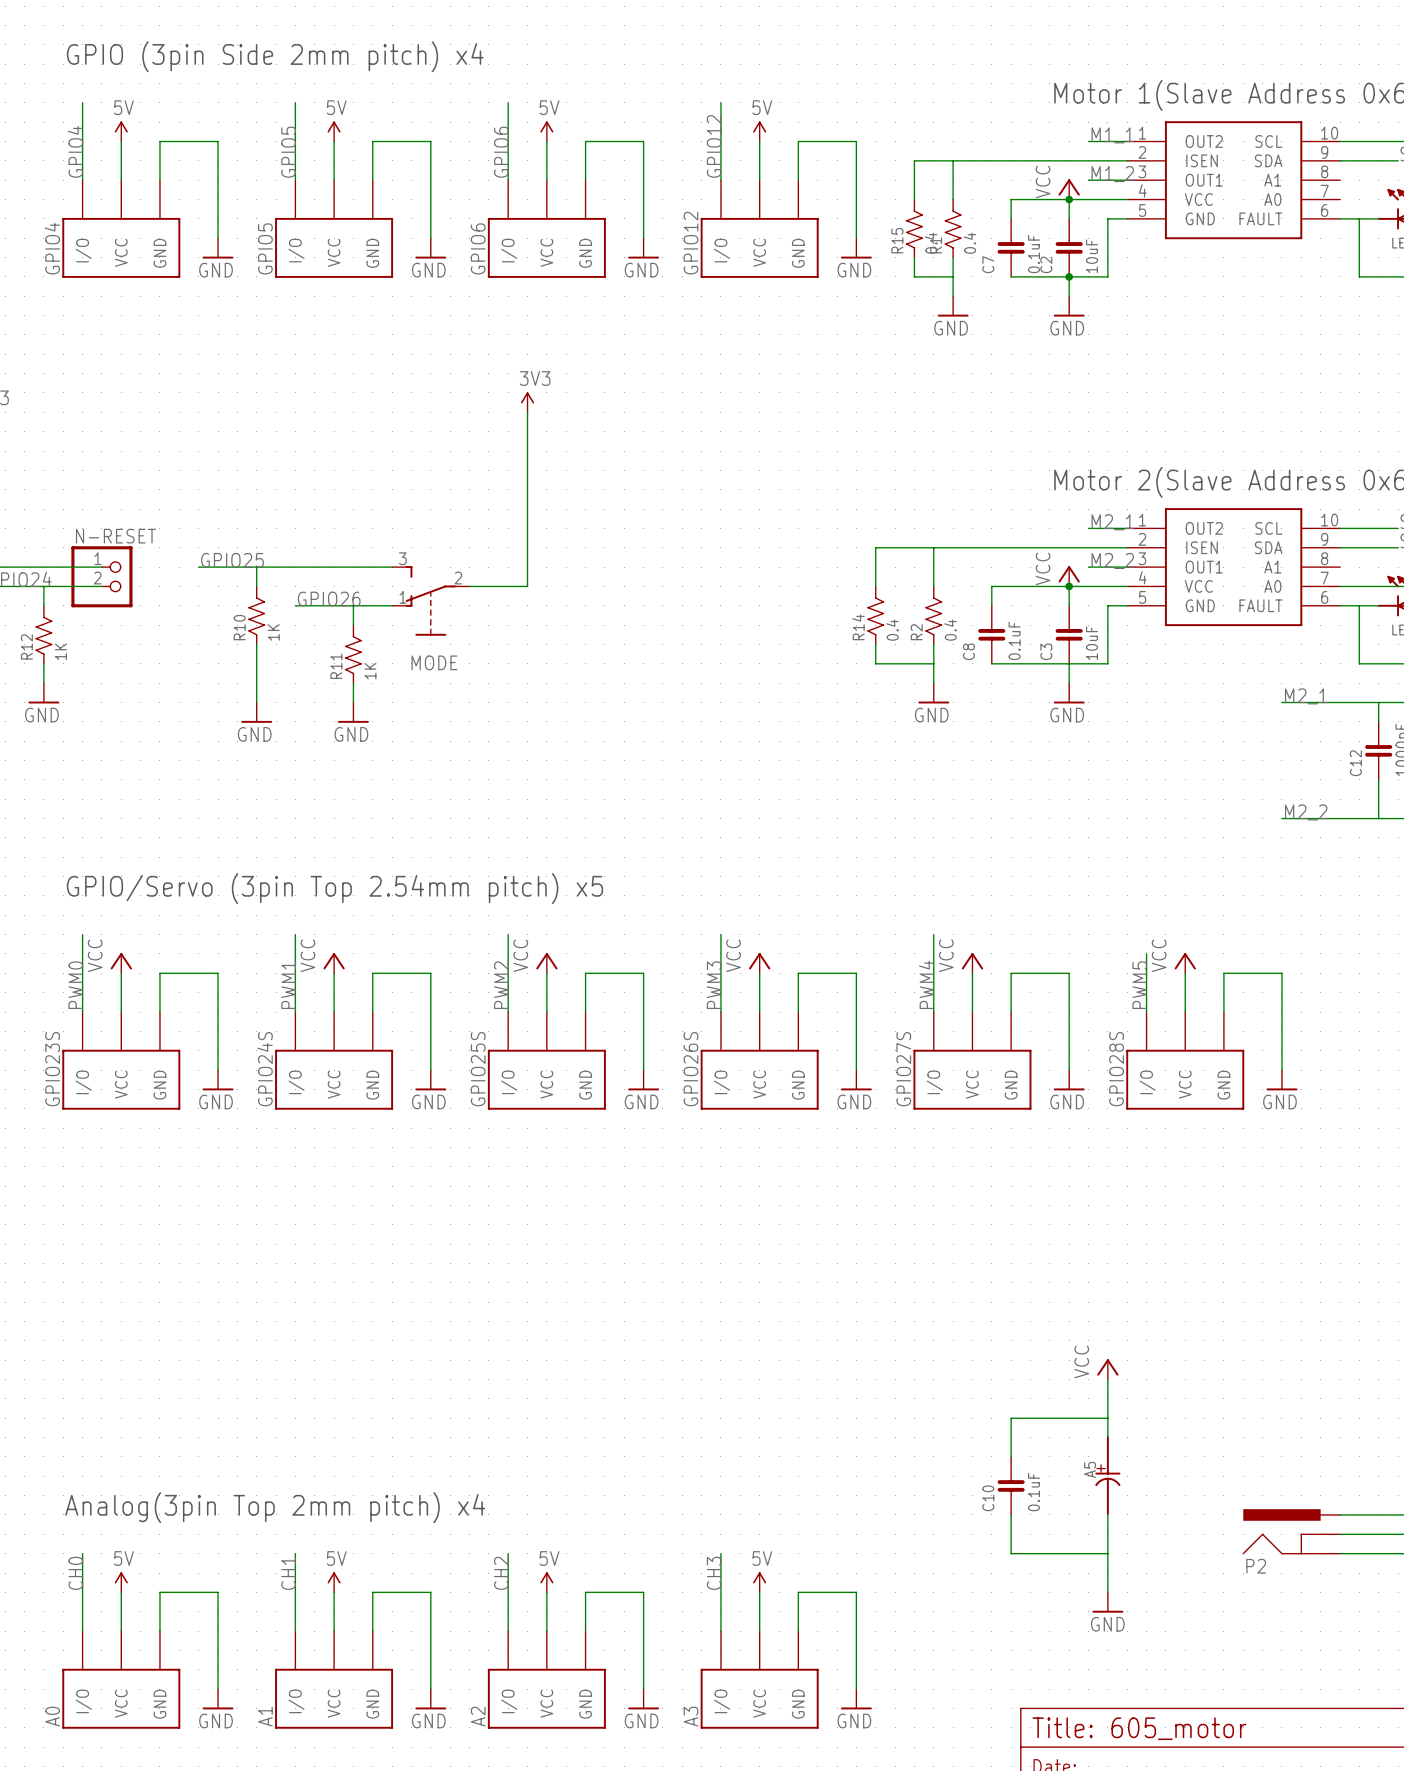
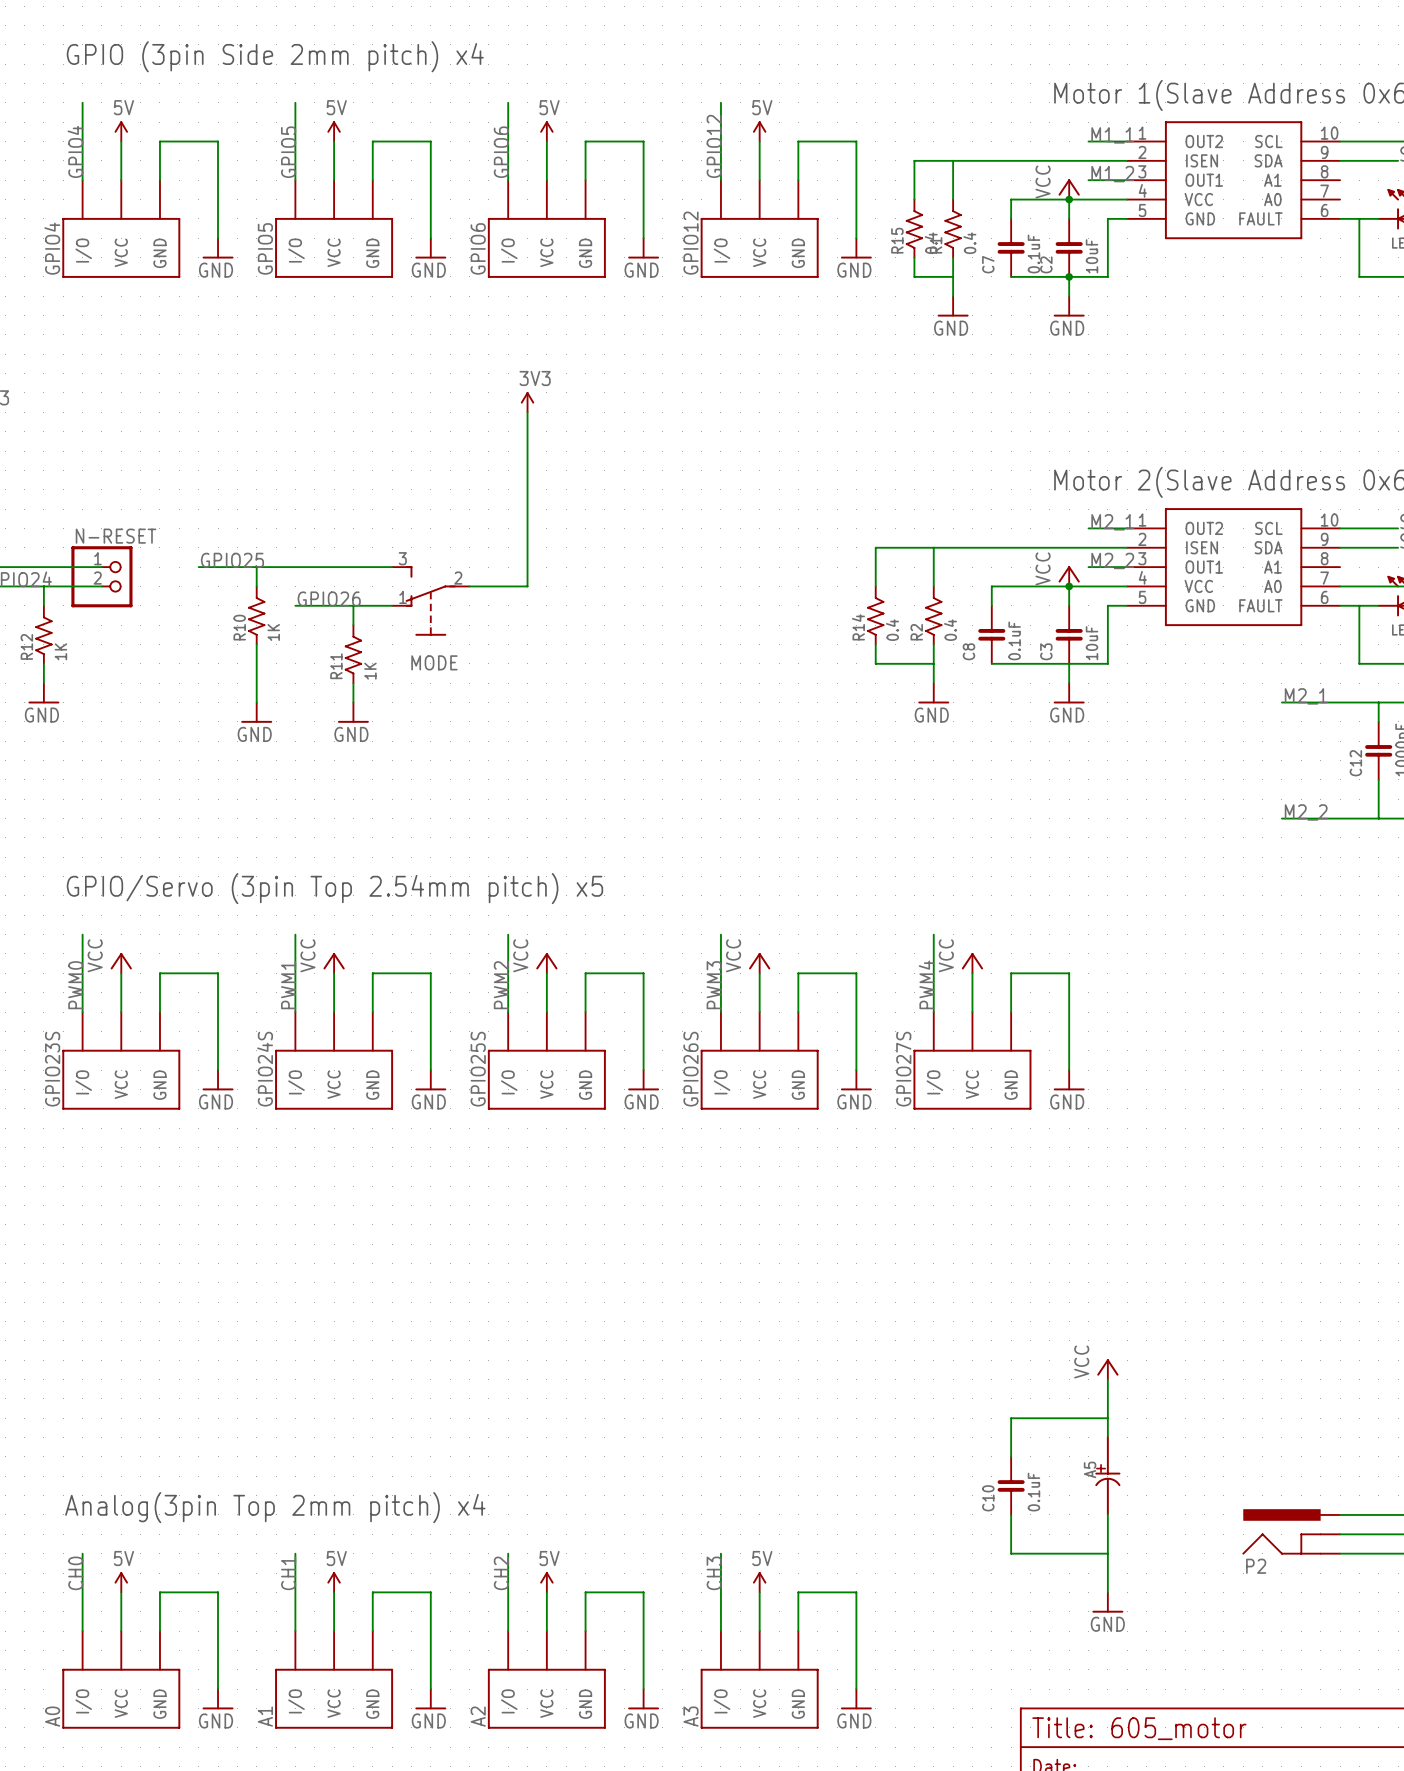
wire: (1146, 953) (1146, 1012) -> none
power symbol: VCC (1185, 963) -> none
wire: (1185, 973) (1185, 1012) -> none
label: PWM5 (1139, 985) -> none
wire: (1223, 1012) (1223, 973) (1281, 973) (1281, 1070) -> none
GPIO28S: (1185, 1060) -> none
power symbol: GND (1281, 1080) -> none

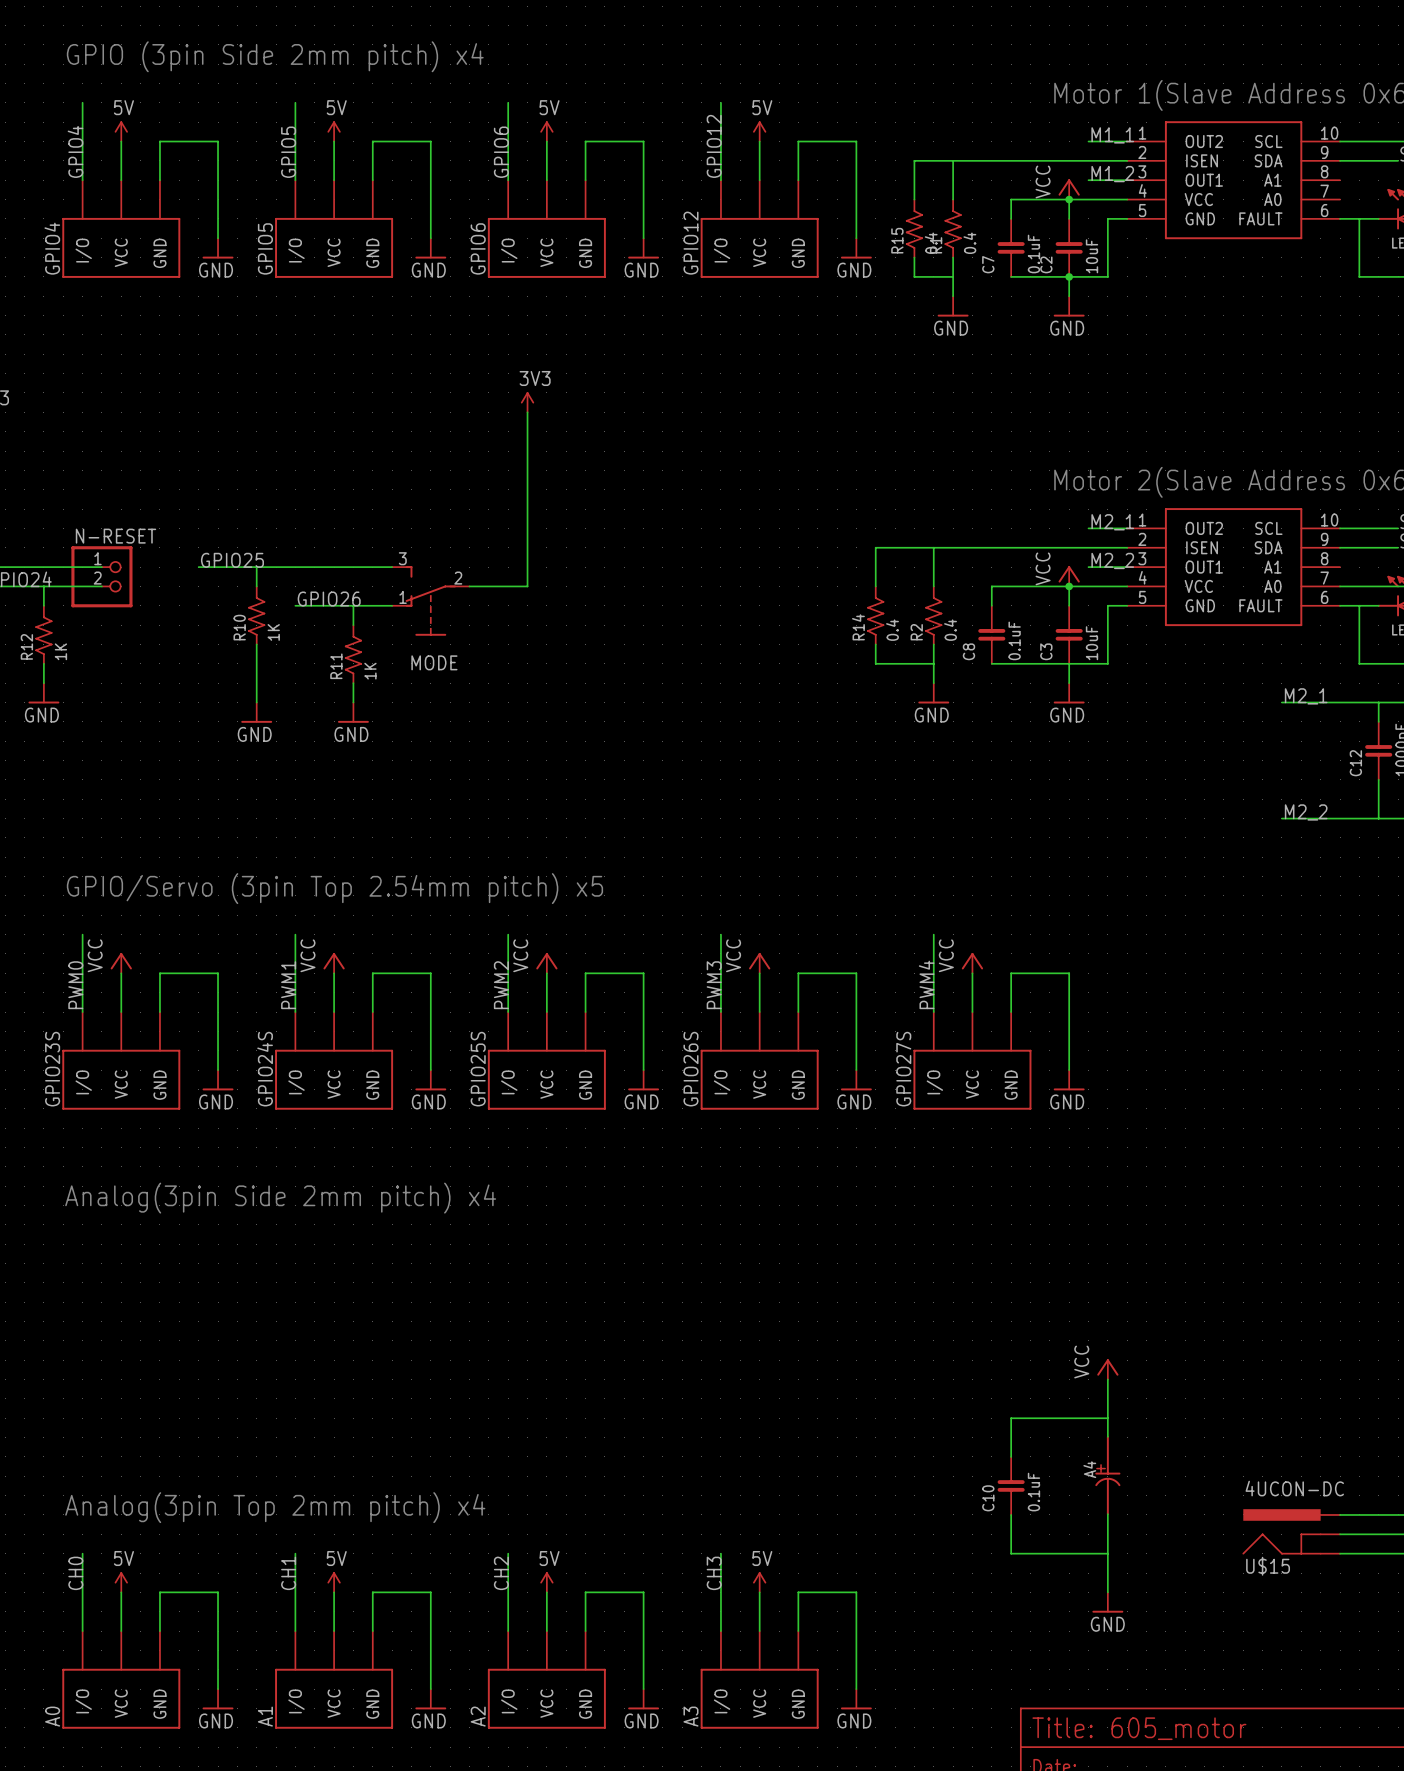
text: none -> Analog(3pin Side 2mm pitch) x4 (280, 1198)
A5 name: A5 (1090, 1469) -> A4 (1089, 1469)
P2 value: none -> 4UCON-DC (1294, 1488)
P2 name: P2 (1256, 1566) -> U$15 (1268, 1566)

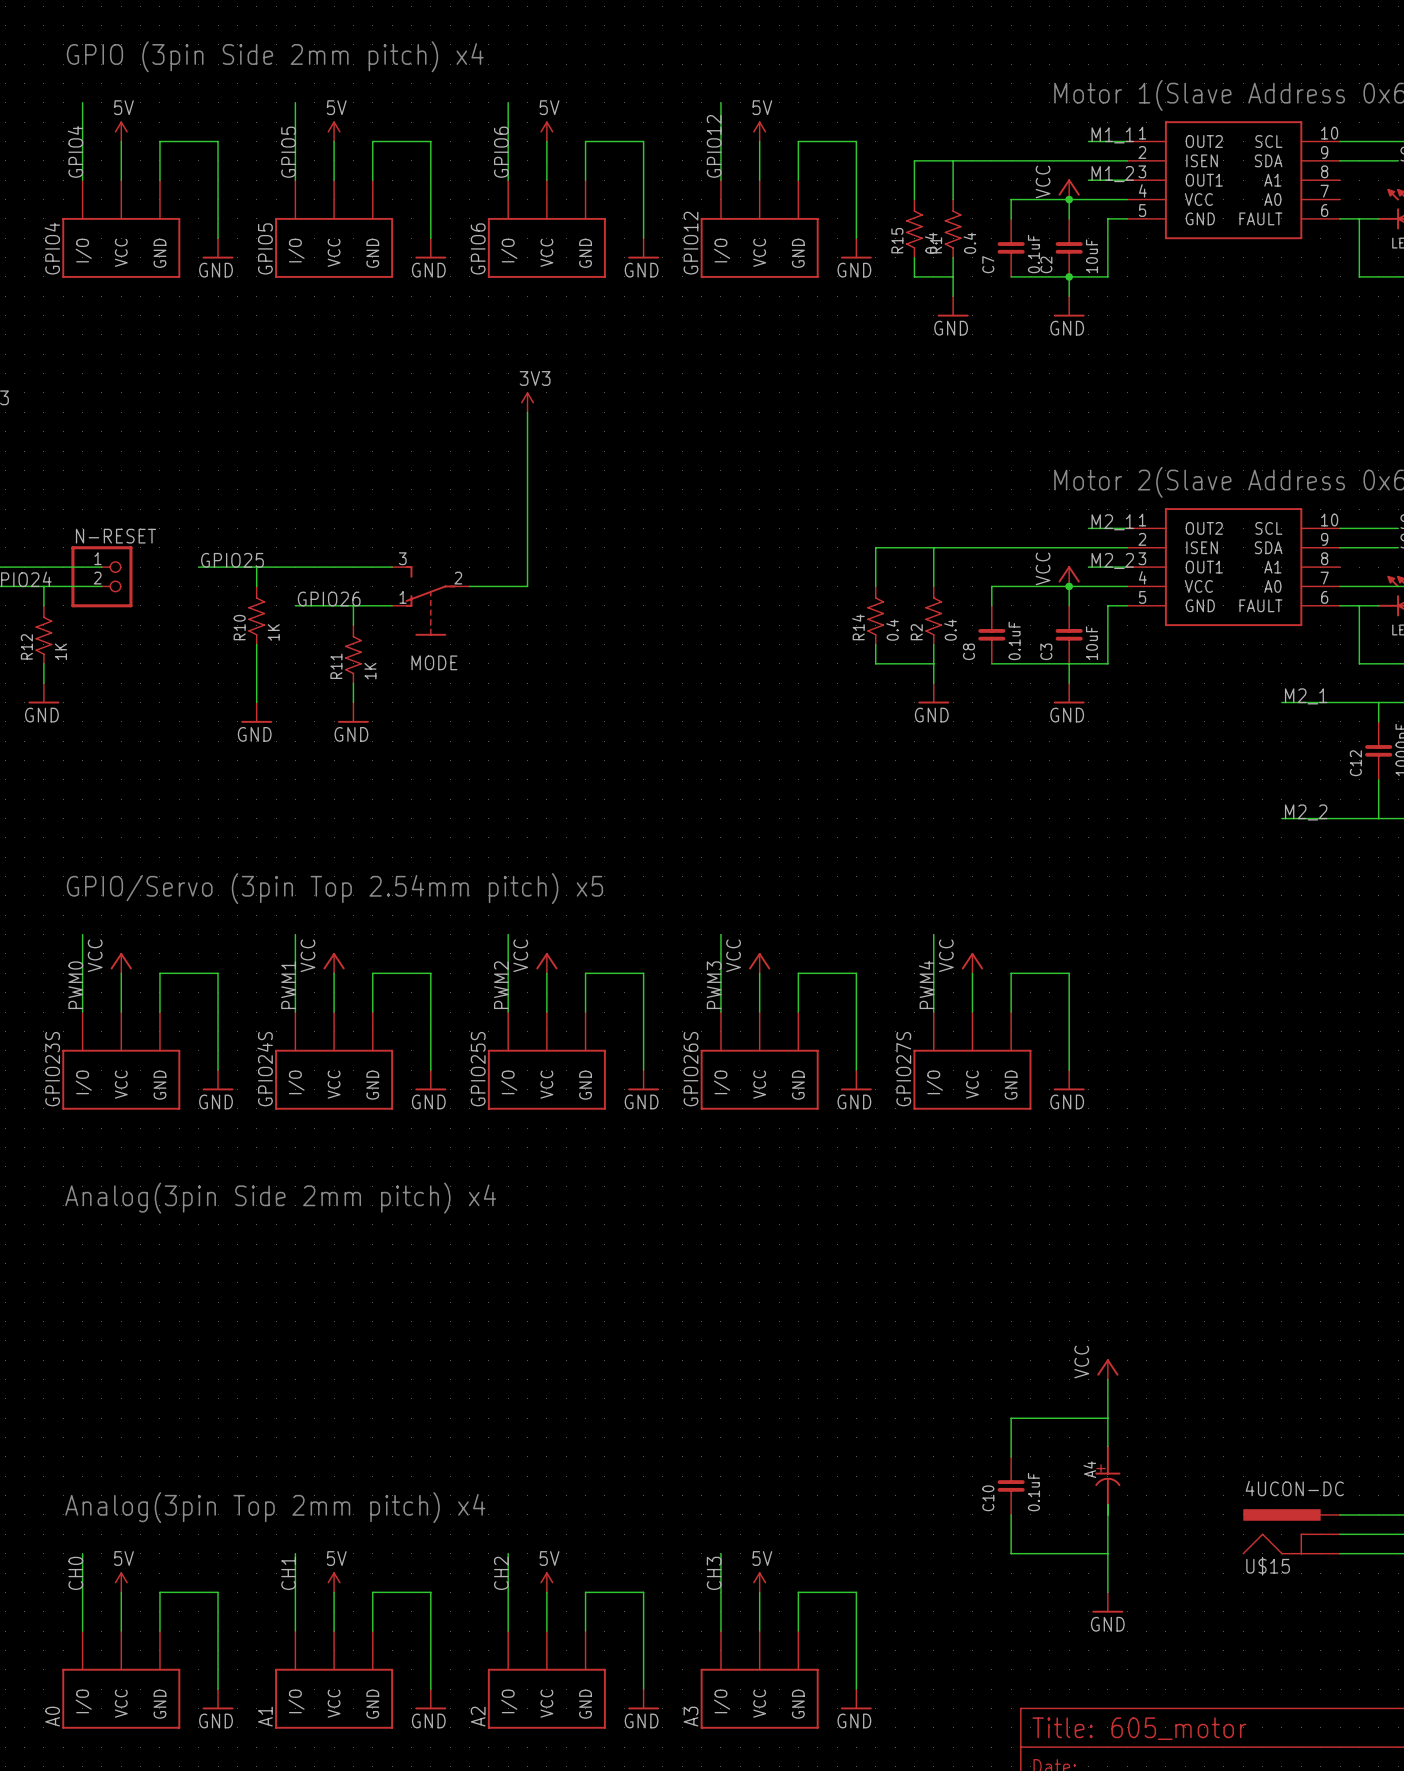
A4 symbol: [1095, 1435, 1121, 1516] -> [1095, 1445, 1121, 1506]

